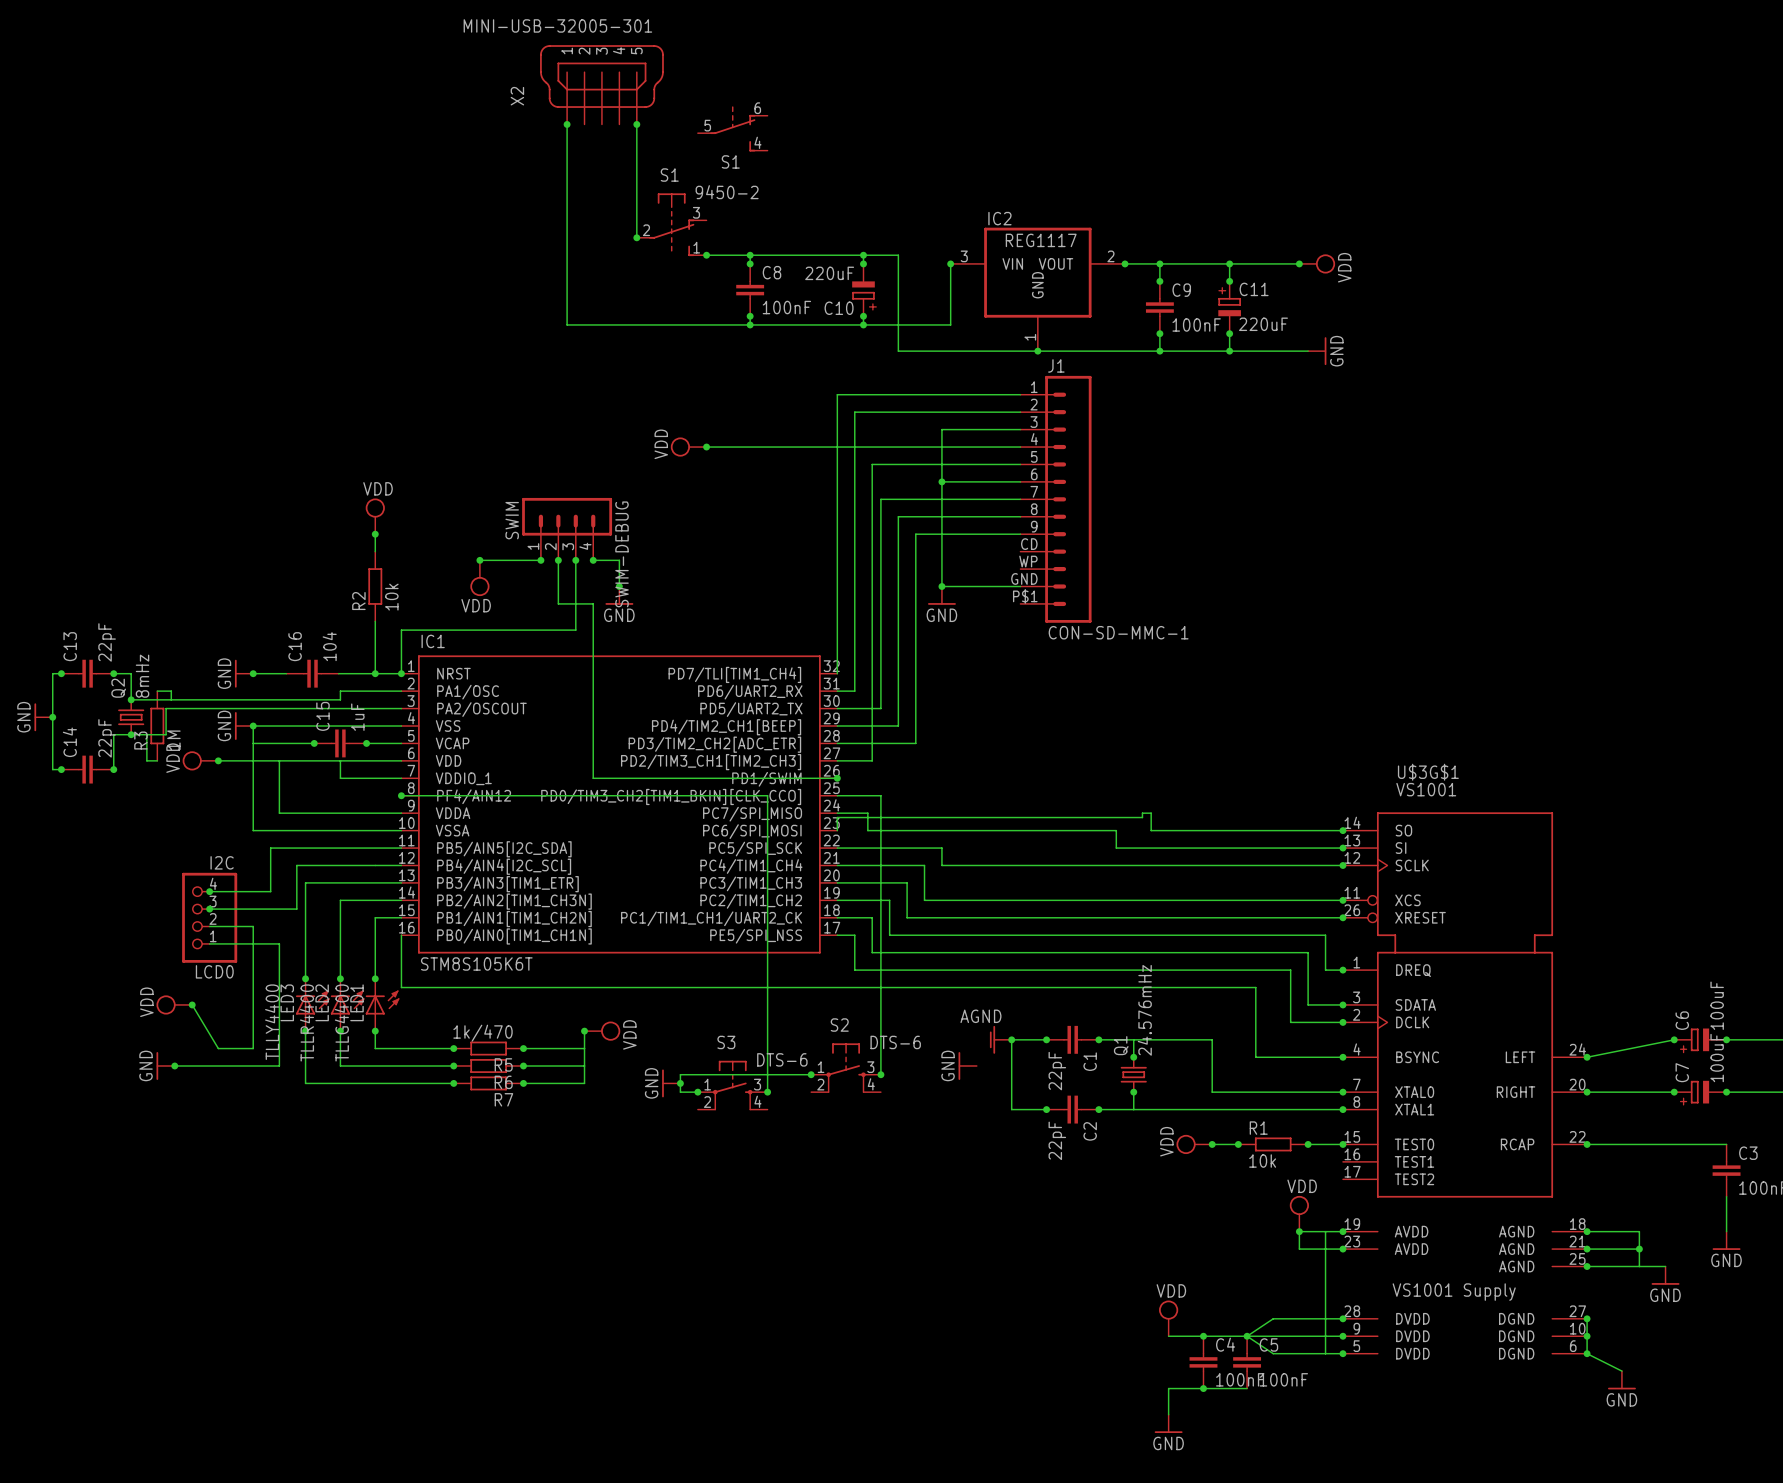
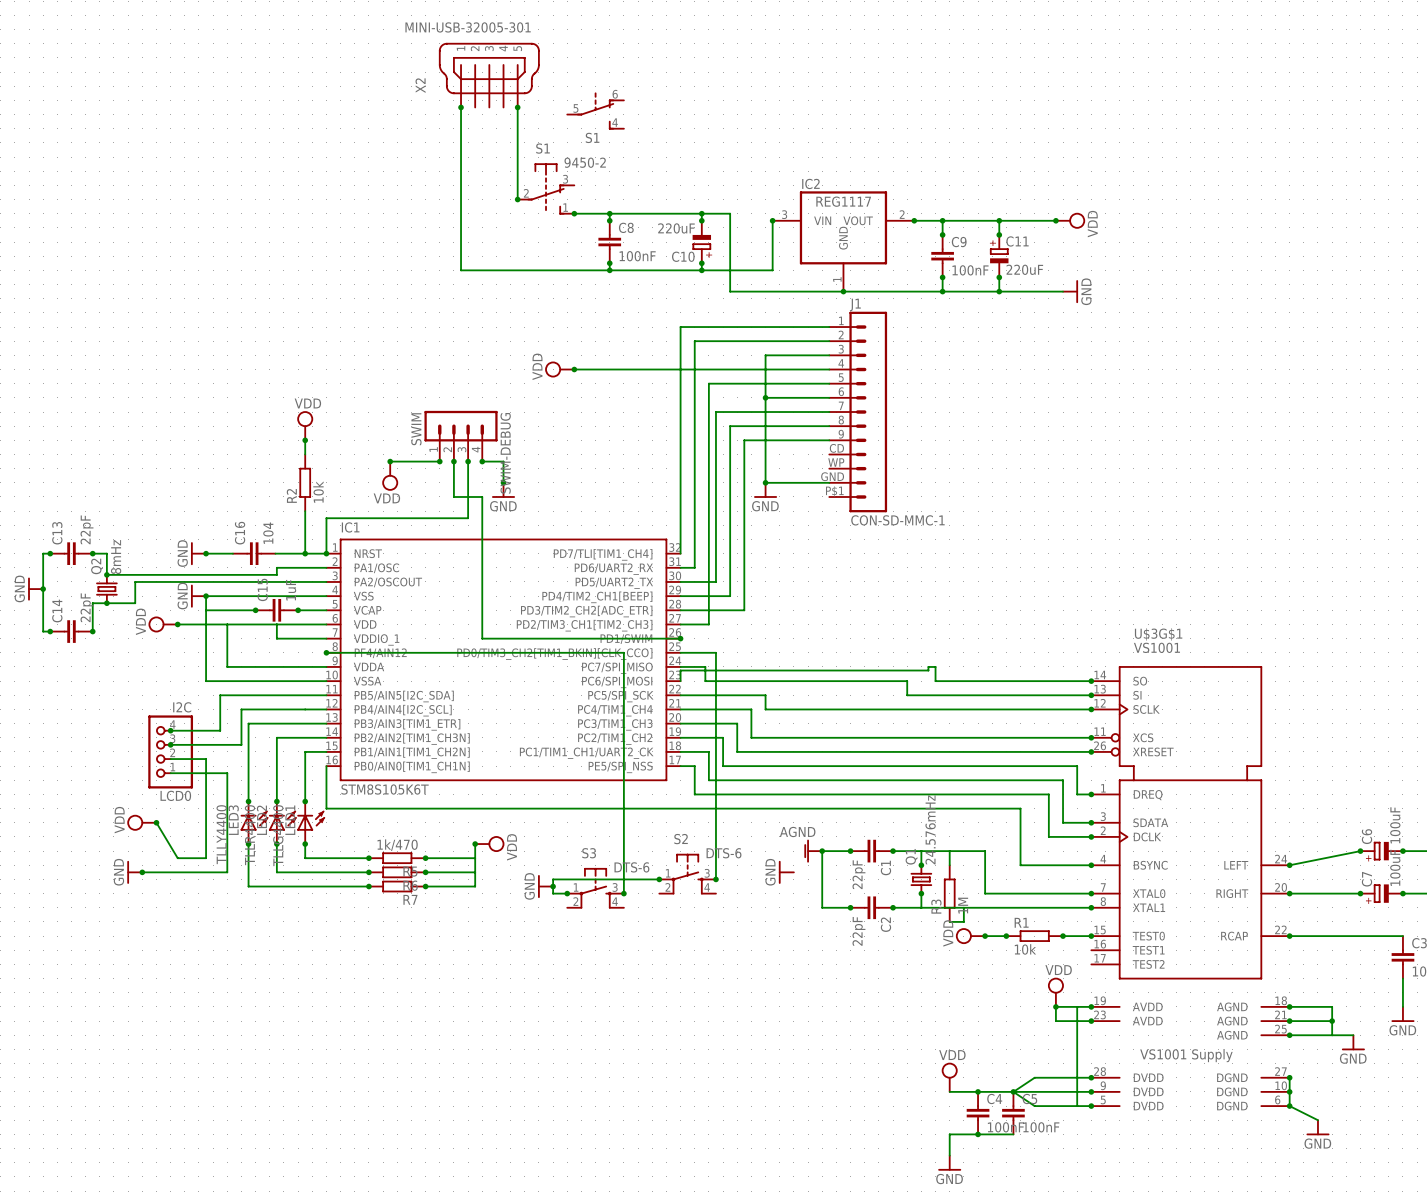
wire: (157, 691) (171, 691) (171, 699) -> none
R3 position: (157, 726) -> (949, 893)
wire: (146, 734) (146, 760) (157, 760) -> none
wire: none -> (949, 851) (949, 865)
wire: none -> (963, 907) (963, 921) (949, 921)

